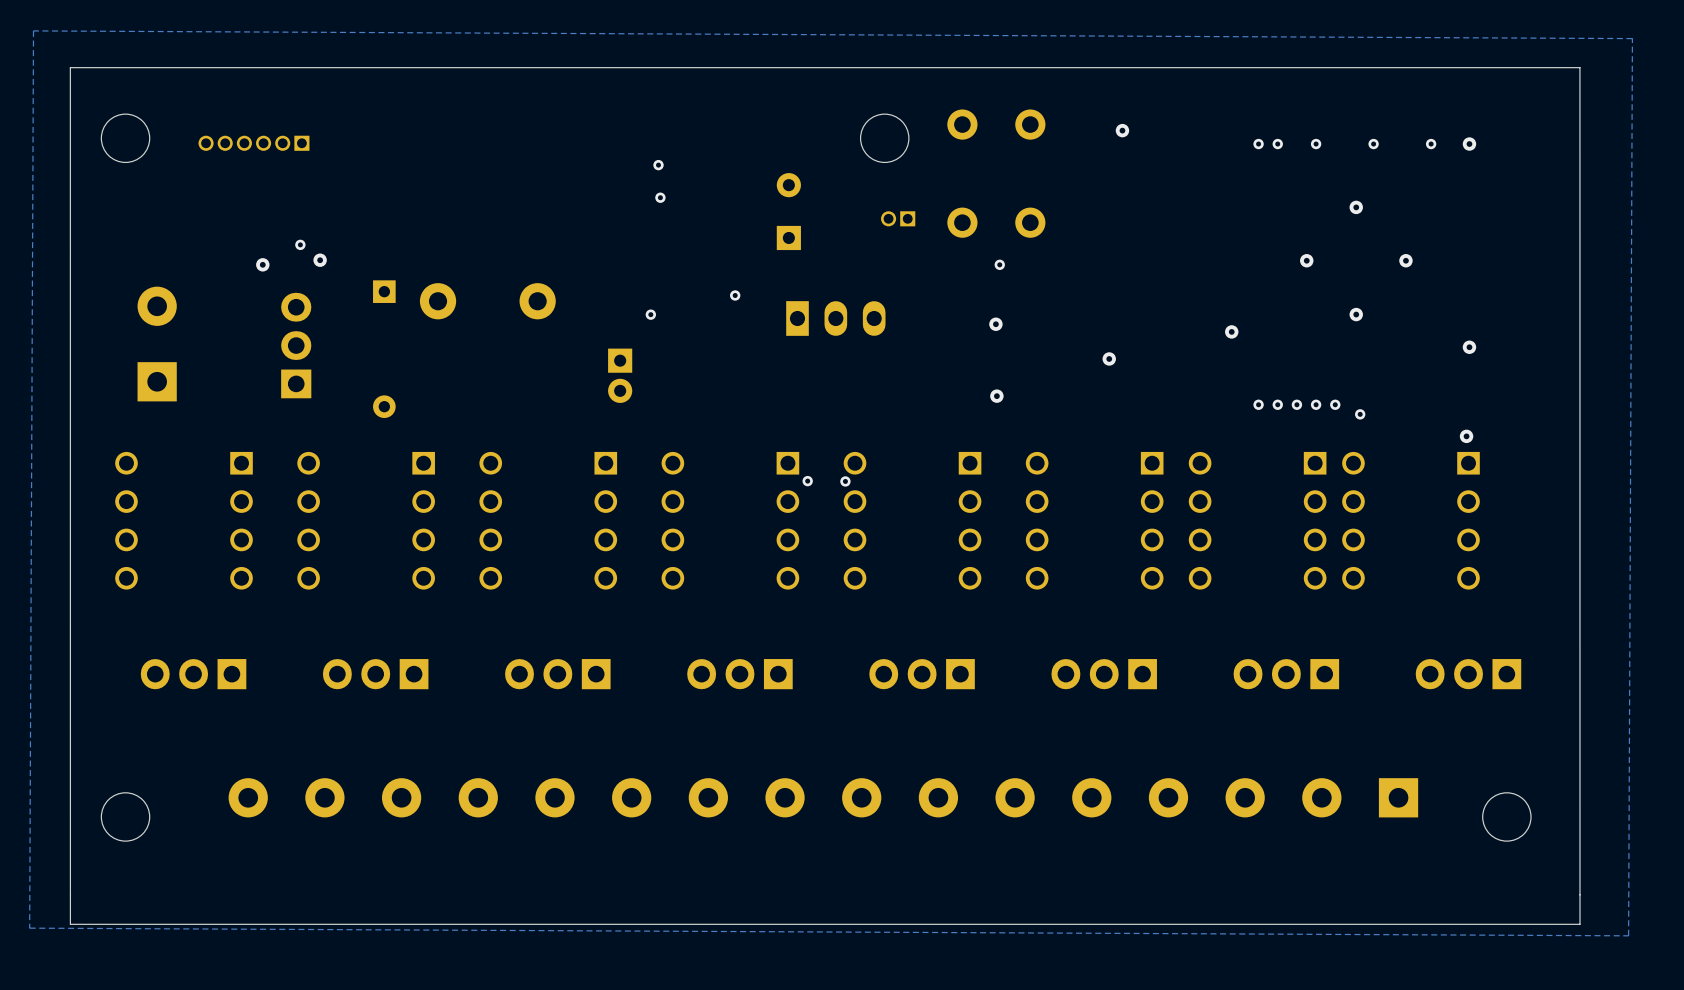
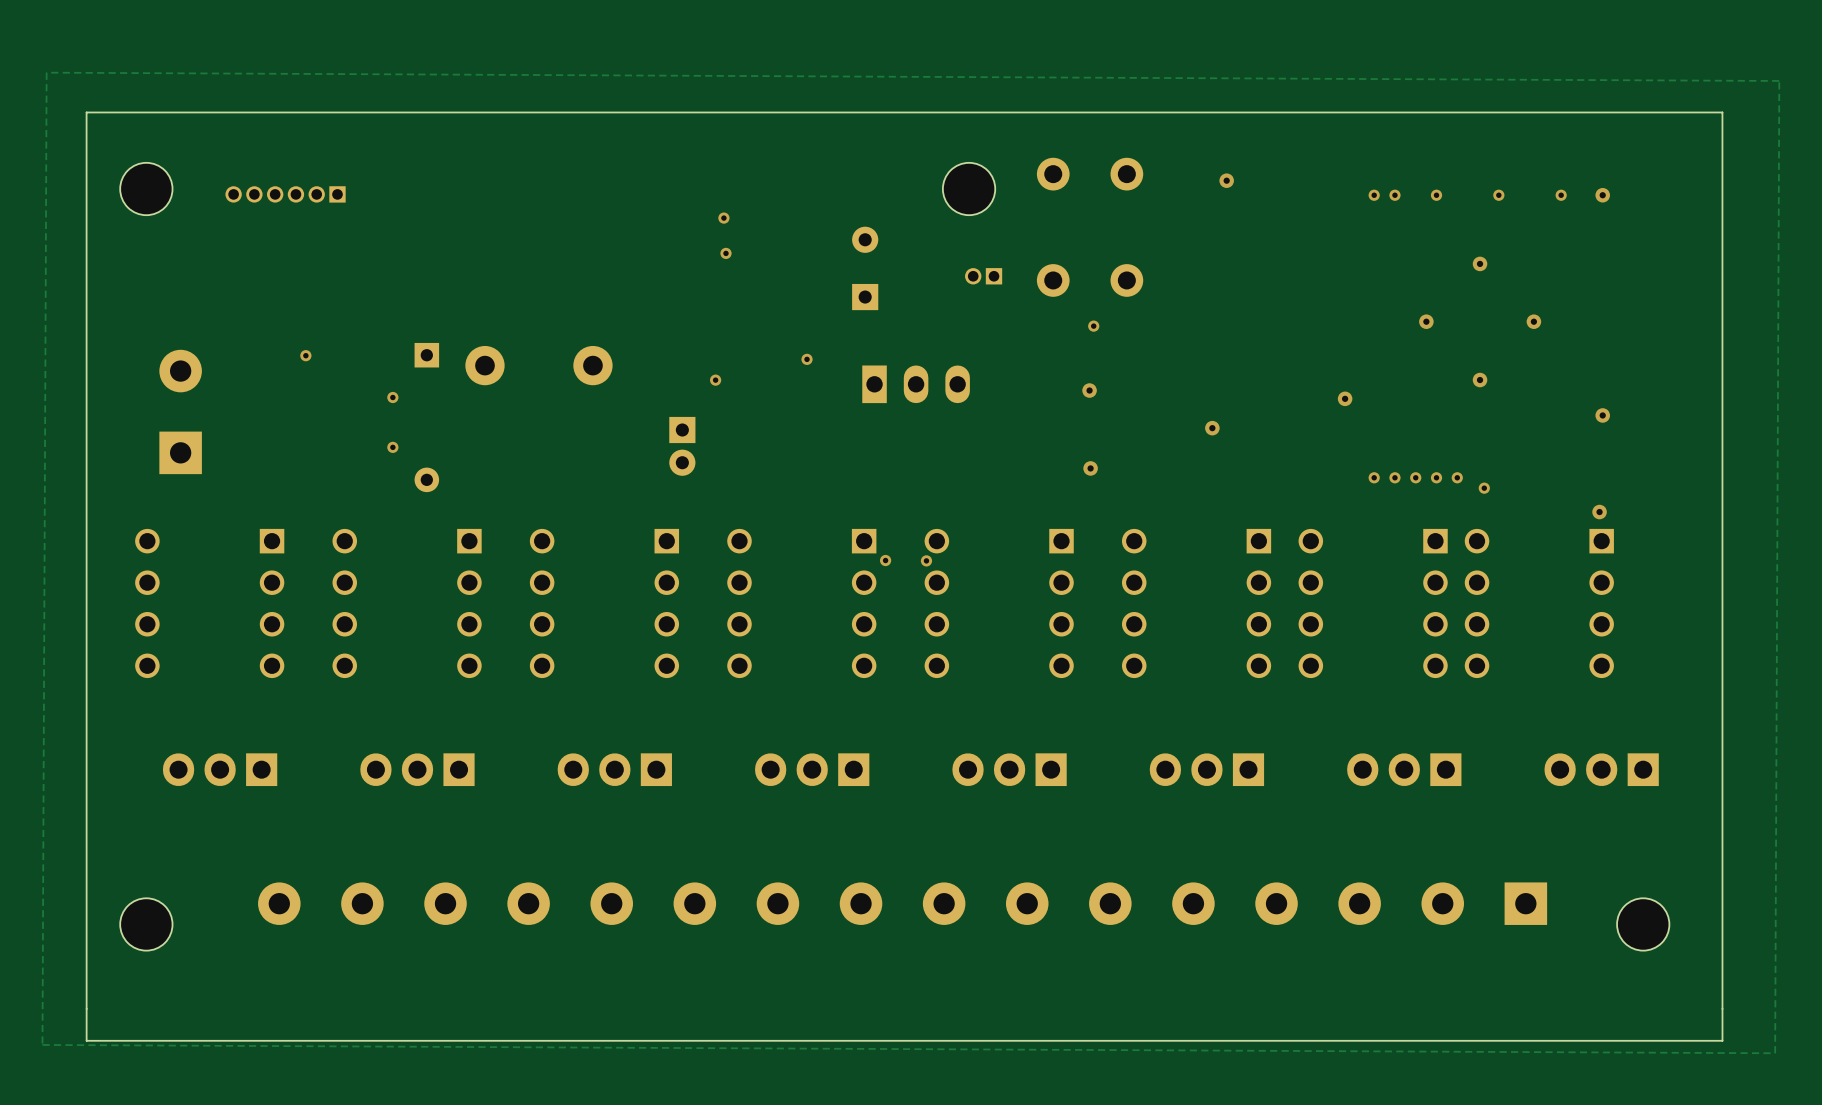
via: (300, 244) -> none
via: (320, 260) -> none
via: (262, 264) -> none
via: none -> (305, 355)
via: none -> (392, 397)
part: (296, 345) -> none
via: none -> (392, 447)

